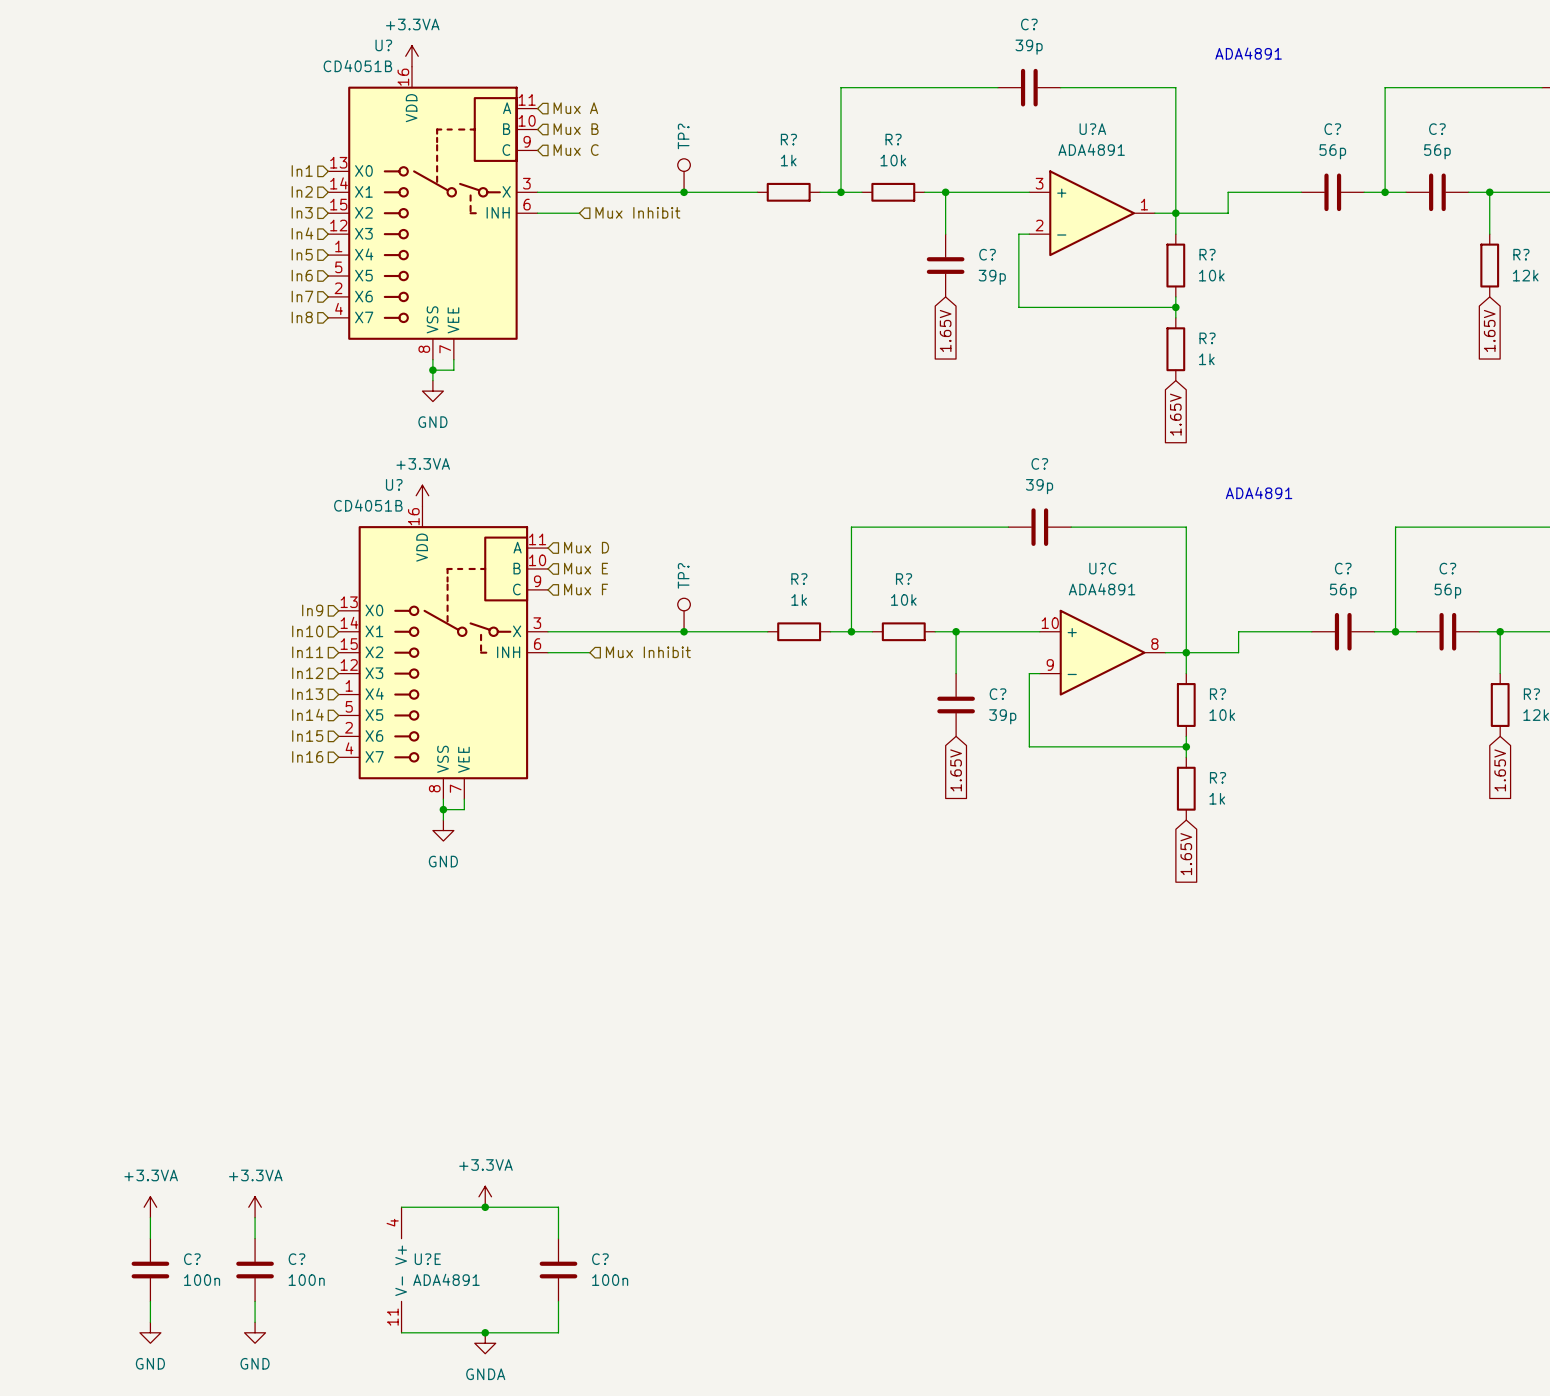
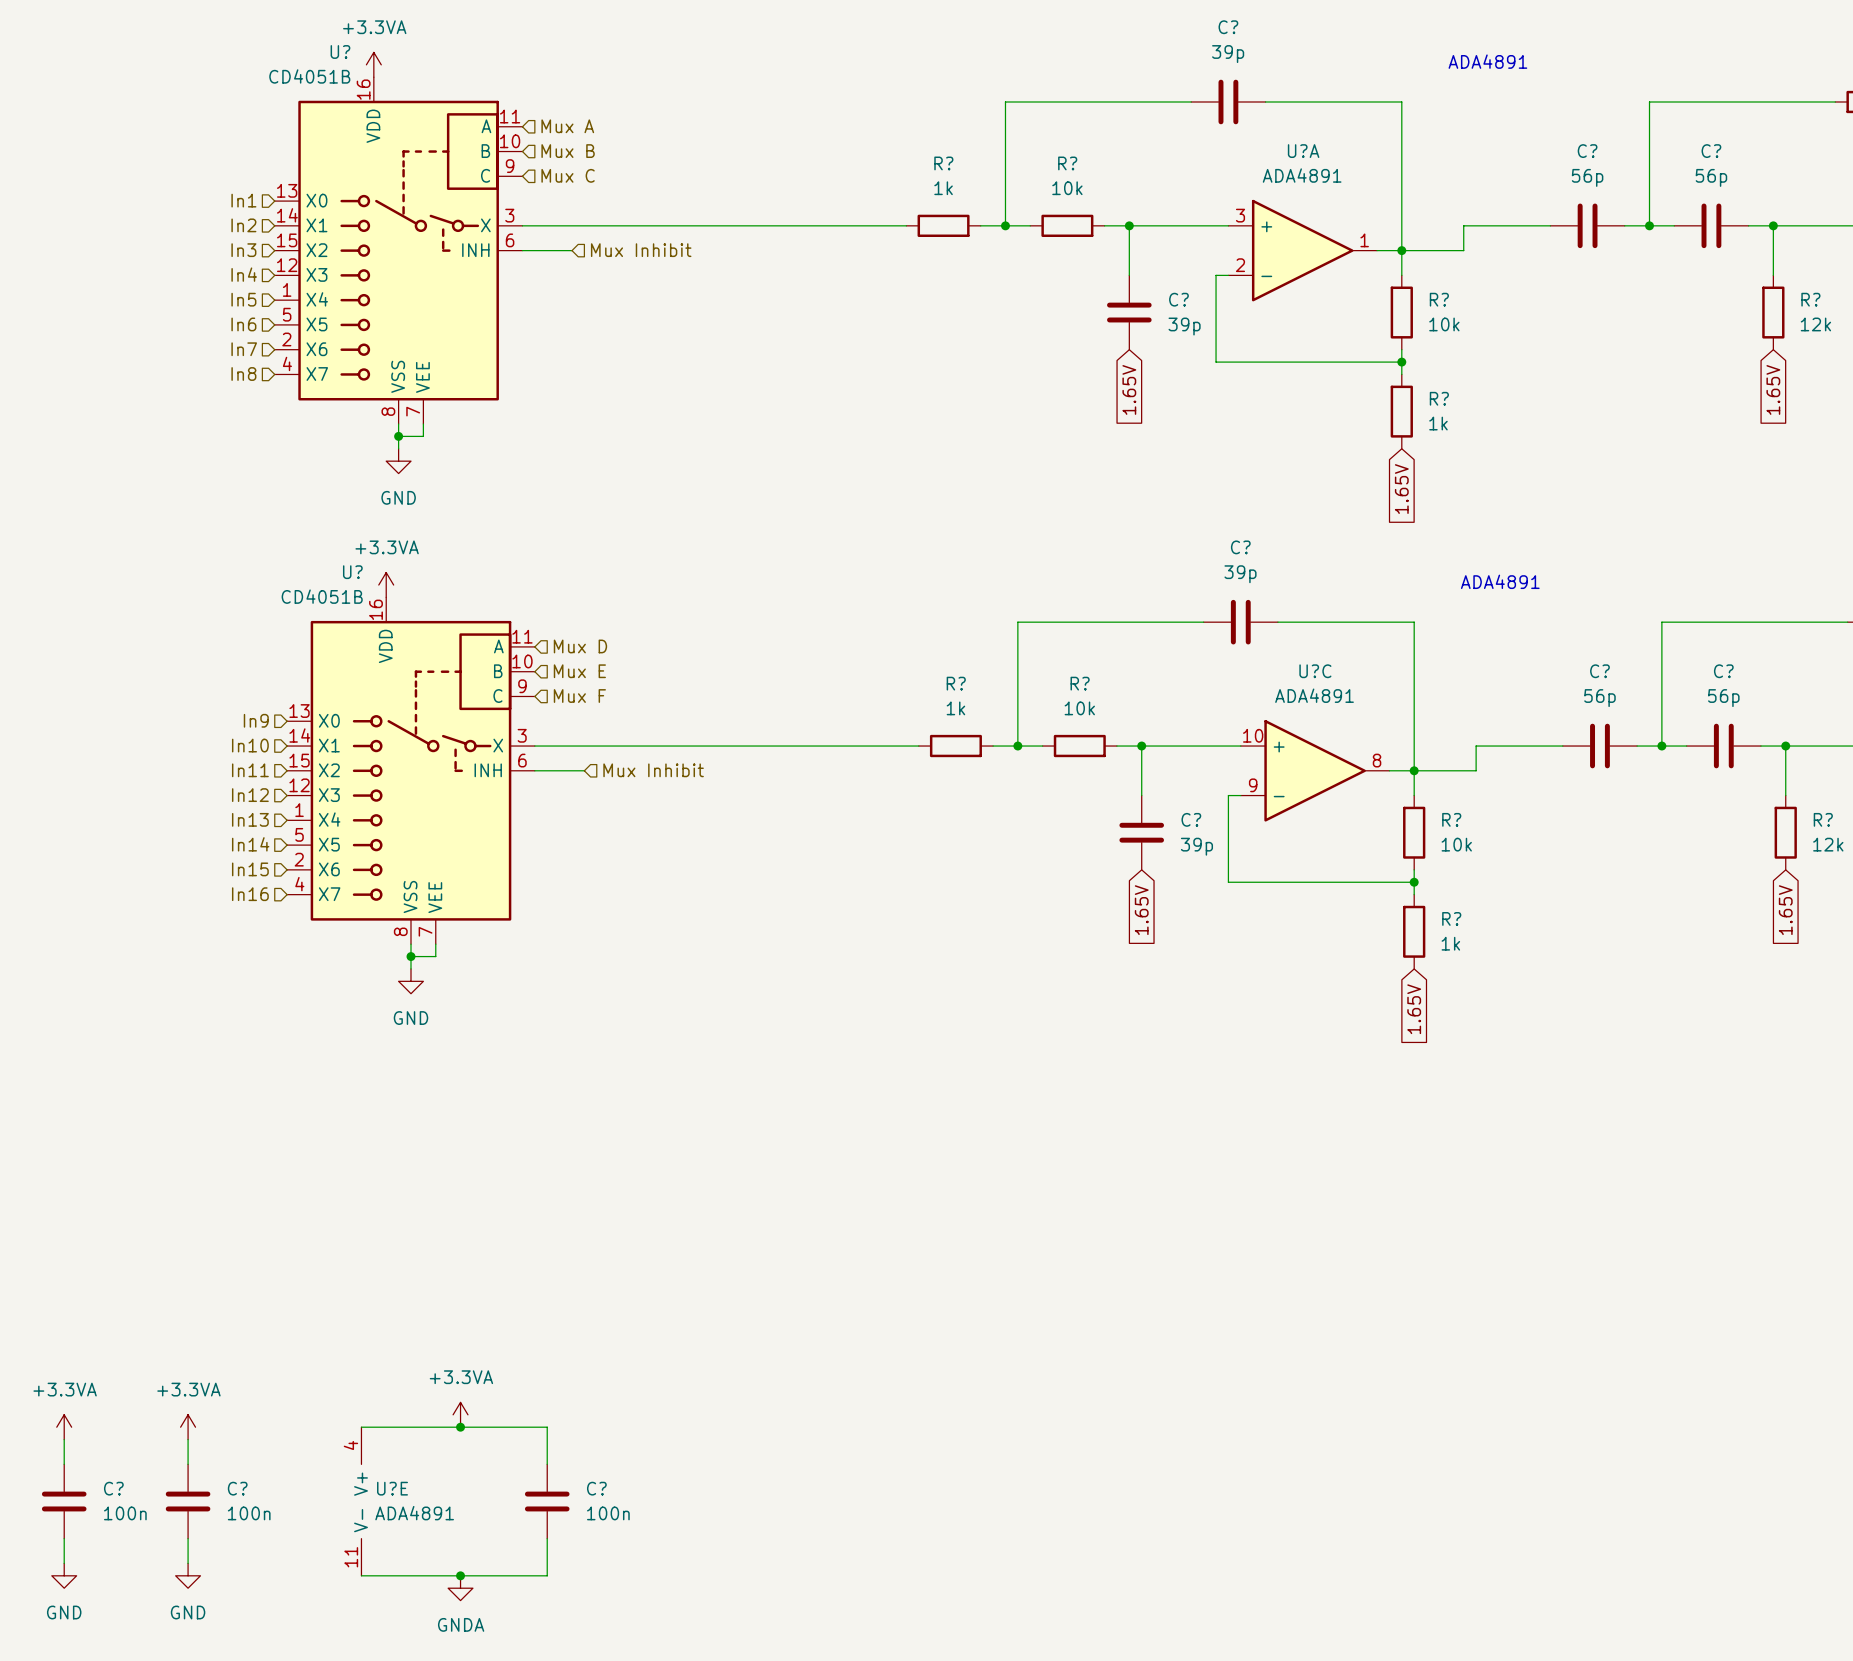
power symbol position: +3.3VA (411, 56) -> +3.3VA (373, 64)
hierarchical label position: Mux A (575, 108) -> Mux A (567, 126)
hierarchical label position: Mux B (576, 129) -> Mux B (568, 151)
hierarchical label position: Mux C (576, 150) -> Mux C (568, 175)
hierarchical label position: In1 (302, 170) -> In1 (243, 200)
TP?: (684, 175) -> none
hierarchical label position: In2 (302, 191) -> In2 (243, 225)
junction: (684, 192) -> none
hierarchical label position: In3 (302, 212) -> In3 (243, 250)
hierarchical label position: Mux Inhibit (637, 212) -> Mux Inhibit (641, 250)
U? position: (432, 213) -> (398, 250)
hierarchical label position: In4 (302, 233) -> In4 (244, 274)
hierarchical label position: In5 (302, 254) -> In5 (243, 299)
hierarchical label position: In6 (302, 275) -> In6 (243, 324)
hierarchical label position: In7 (302, 296) -> In7 (244, 349)
hierarchical label position: In8 (302, 317) -> In8 (243, 374)
wire: (432, 359) (432, 380) -> (398, 424) (398, 448)
wire: (453, 359) (453, 370) (432, 370) -> (423, 424) (423, 436) (398, 436)
junction: none -> (398, 436)
junction: (432, 370) -> none
power symbol position: GND (432, 391) -> GND (398, 461)
power symbol position: +3.3VA (422, 495) -> +3.3VA (386, 585)
hierarchical label position: Mux D (586, 547) -> Mux D (580, 646)
hierarchical label position: Mux E (586, 568) -> Mux E (579, 671)
hierarchical label position: Mux F (586, 589) -> Mux F (579, 696)
hierarchical label position: In9 (312, 610) -> In9 (256, 720)
TP?: (684, 615) -> none
hierarchical label position: In10 (307, 631) -> In10 (250, 745)
junction: (684, 631) -> none
hierarchical label position: In11 (307, 652) -> In11 (250, 770)
U? position: (443, 652) -> (410, 770)
hierarchical label position: Mux Inhibit (648, 652) -> Mux Inhibit (653, 770)
hierarchical label position: In12 (307, 673) -> In12 (250, 795)
hierarchical label position: In13 (307, 694) -> In13 (250, 819)
hierarchical label position: In14 (307, 714) -> In14 (250, 844)
hierarchical label position: In15 (307, 736) -> In15 (250, 869)
hierarchical label position: In16 (307, 756) -> In16 (250, 894)
wire: (443, 799) (443, 820) -> (410, 944) (410, 968)
wire: (464, 799) (464, 809) (443, 809) -> (435, 944) (435, 956) (410, 956)
junction: none -> (410, 956)
junction: (443, 809) -> none
power symbol position: GND (443, 830) -> GND (410, 981)
power symbol: none -> +3.3VA (460, 1414)
power symbol: +3.3VA (485, 1196) -> none
power symbol: none -> +3.3VA (64, 1427)
power symbol: +3.3VA (255, 1207) -> none
wire: none -> (361, 1427) (485, 1427)
junction: none -> (460, 1427)
wire: (453, 1207) (558, 1207) (558, 1238) -> (547, 1427) (547, 1464)
junction: (485, 1207) -> none
wire: none -> (64, 1439) (64, 1464)
wire: (255, 1217) (255, 1238) -> none
C?: none -> 100n (64, 1501)
C?: 100n (255, 1270) -> none
U?E position: (401, 1270) -> (361, 1501)
C?: none -> 100n (547, 1501)
C?: 100n (558, 1270) -> none
wire: none -> (64, 1538) (64, 1563)
wire: (255, 1301) (255, 1322) -> none
wire: (558, 1301) (558, 1332) (453, 1332) -> (547, 1538) (547, 1575)
power symbol: none -> GND (64, 1575)
power symbol: GND (255, 1332) -> none
wire: none -> (361, 1575) (485, 1575)
junction: none -> (460, 1575)
junction: (485, 1332) -> none
power symbol position: GNDA (485, 1343) -> GNDA (460, 1588)

